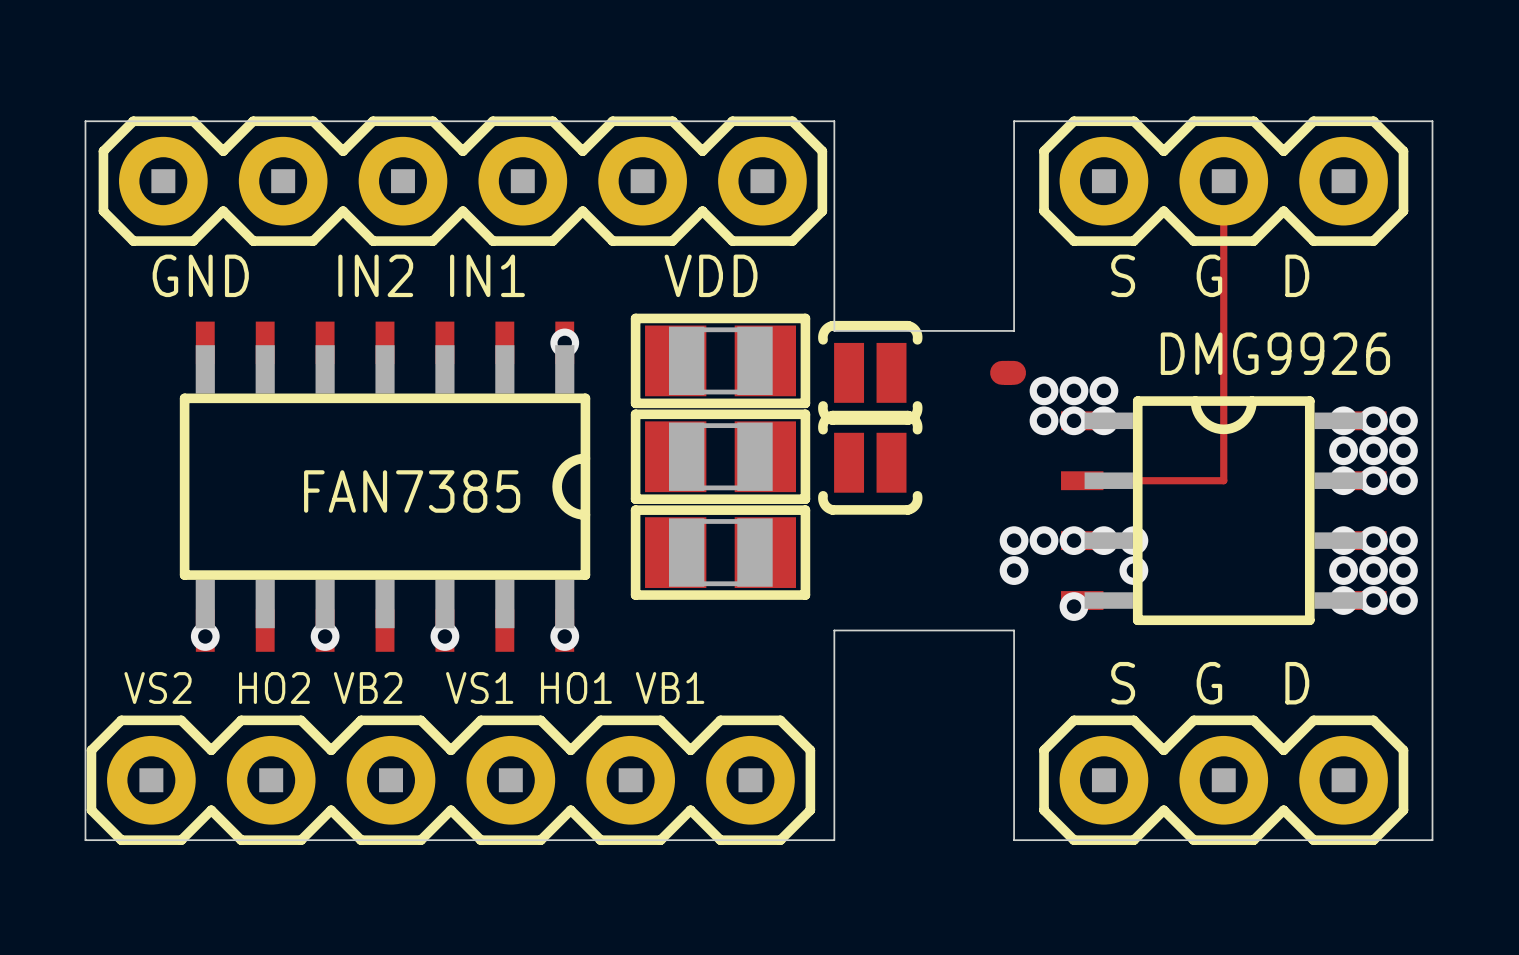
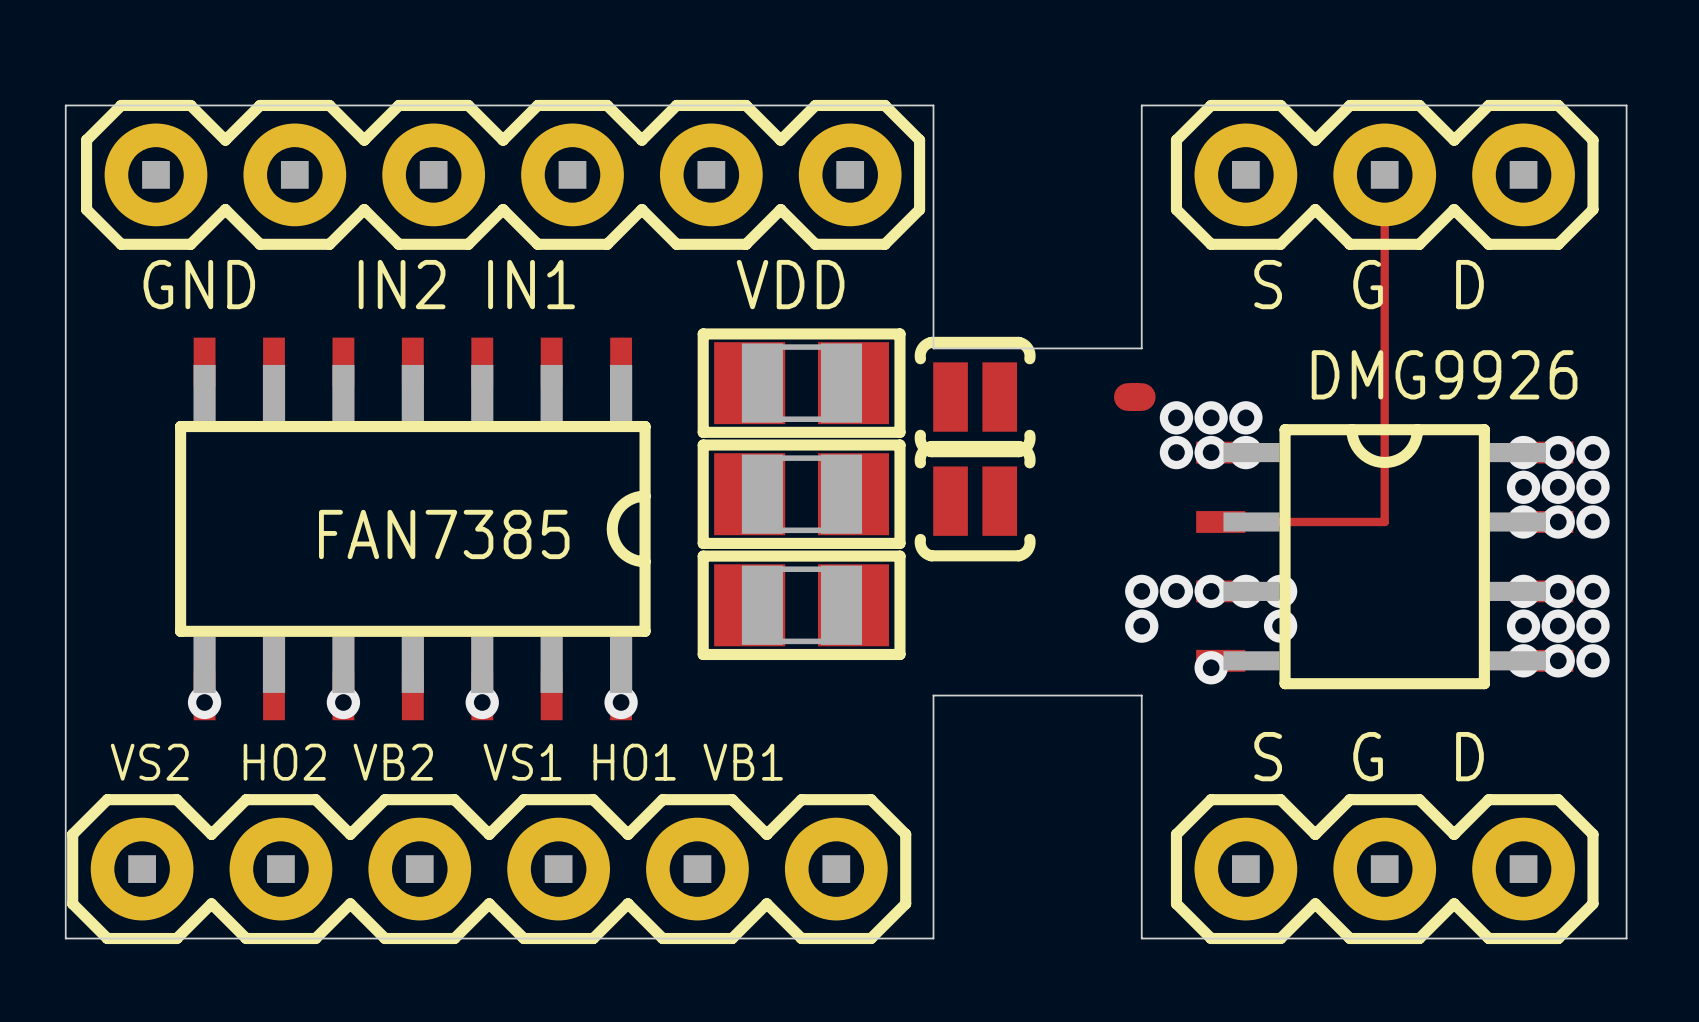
via: (564, 342) -> none

